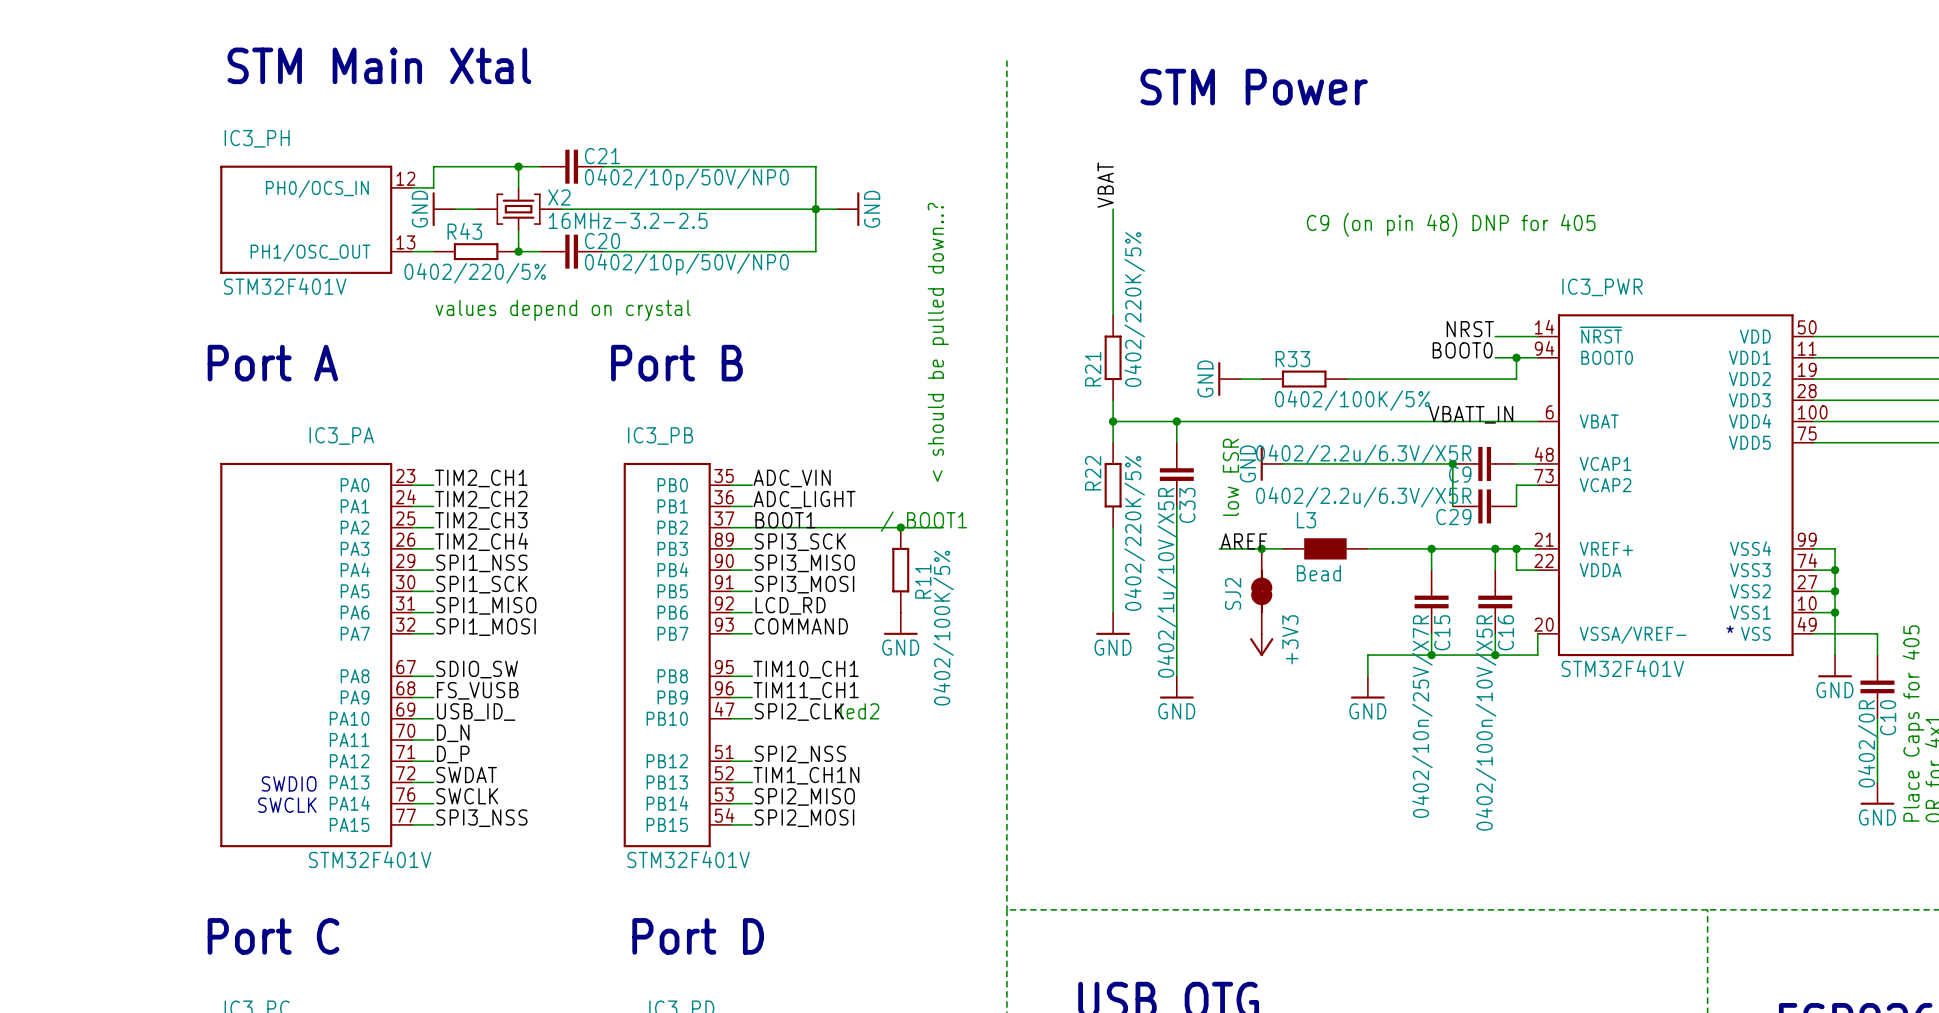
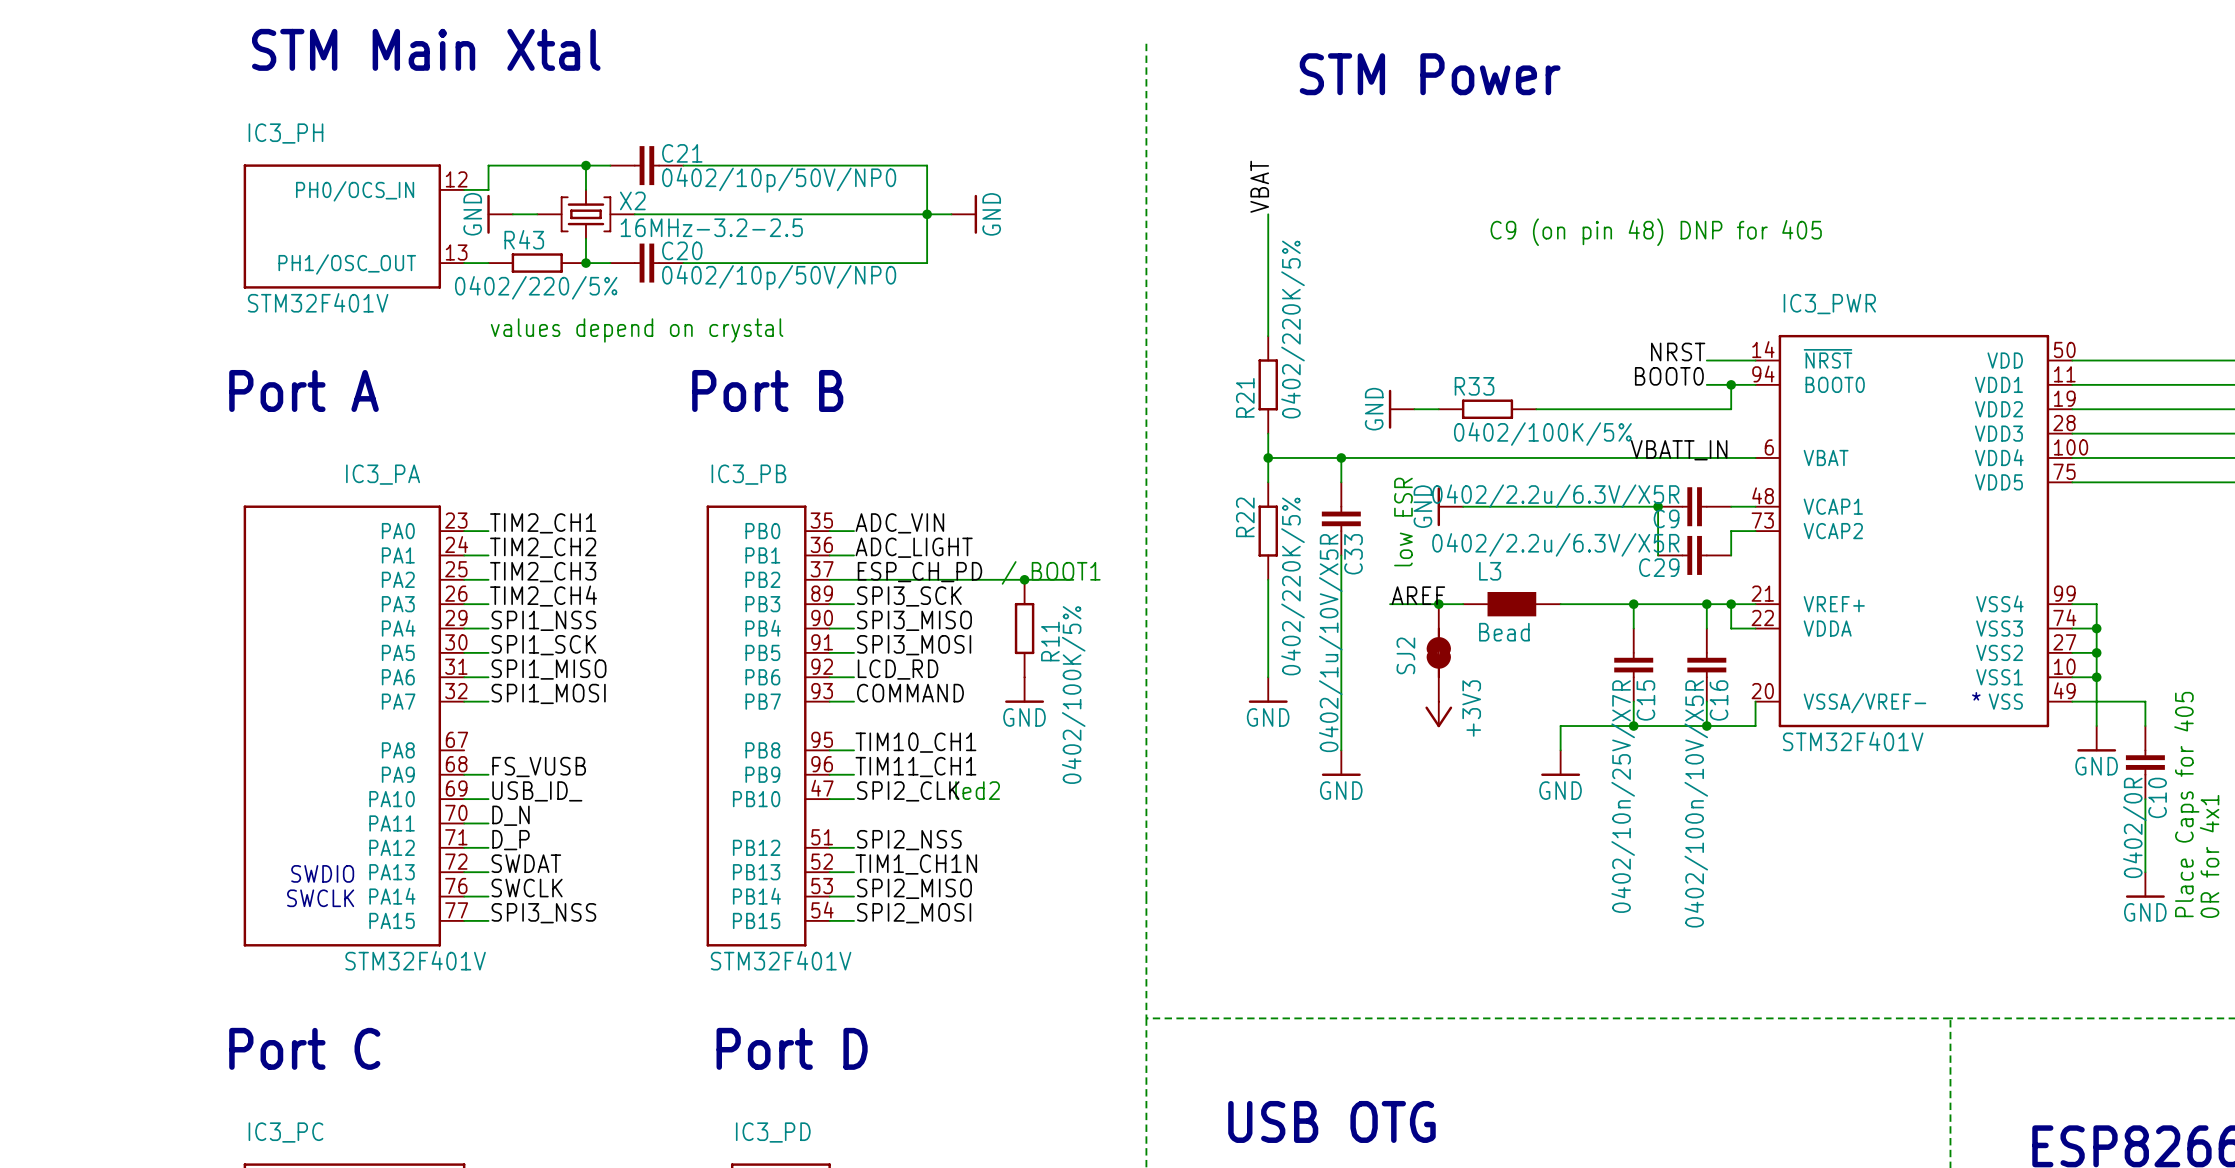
text: < should be pulled down..? (938, 342) -> none
label: BOOT1 (785, 520) -> ESP_CH_PD (919, 572)
label: SDIO_SW (477, 669) -> none
wire: (412, 676) (433, 676) -> none

